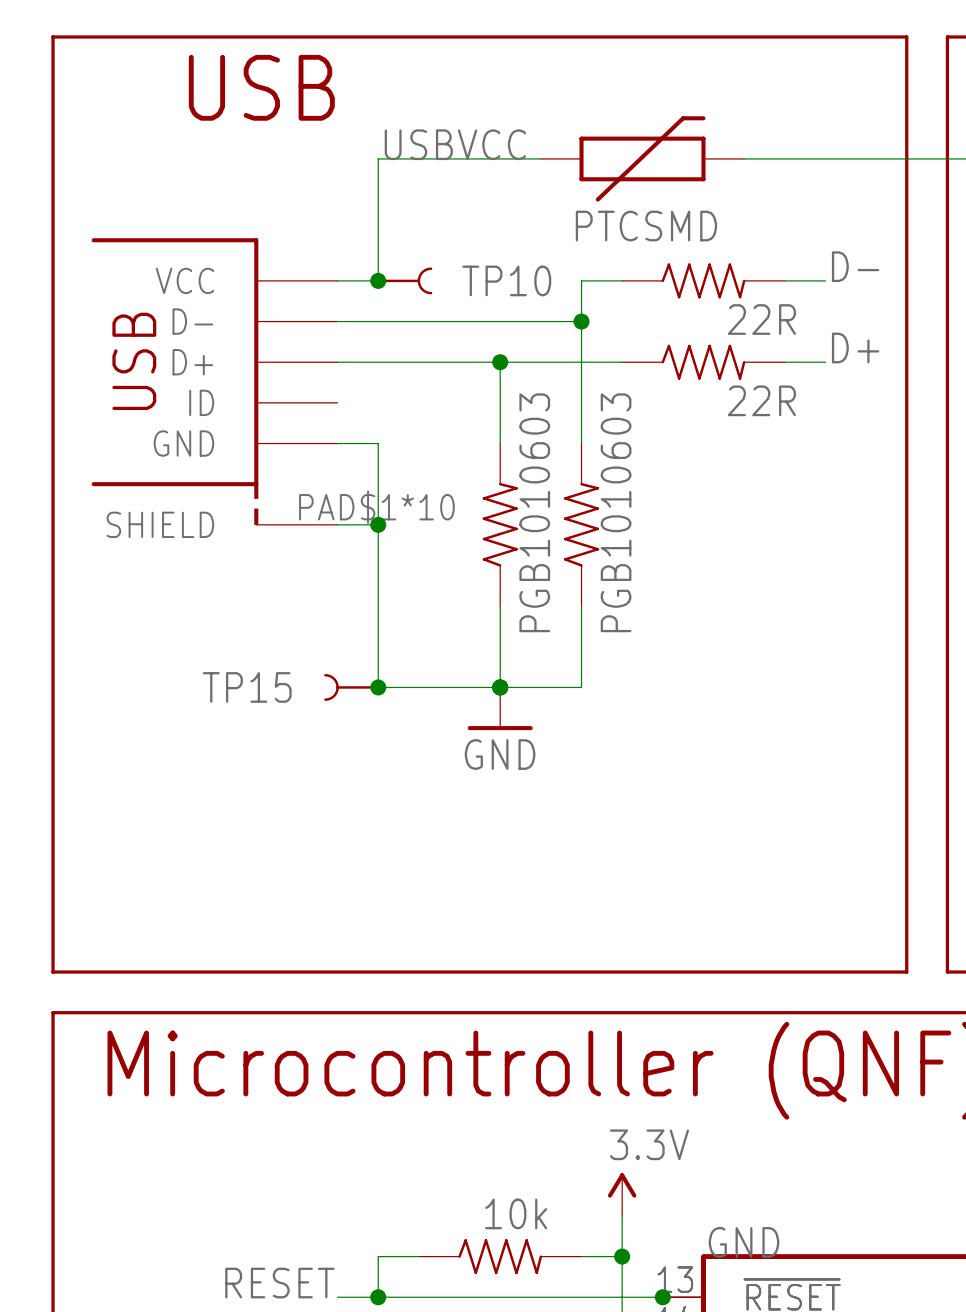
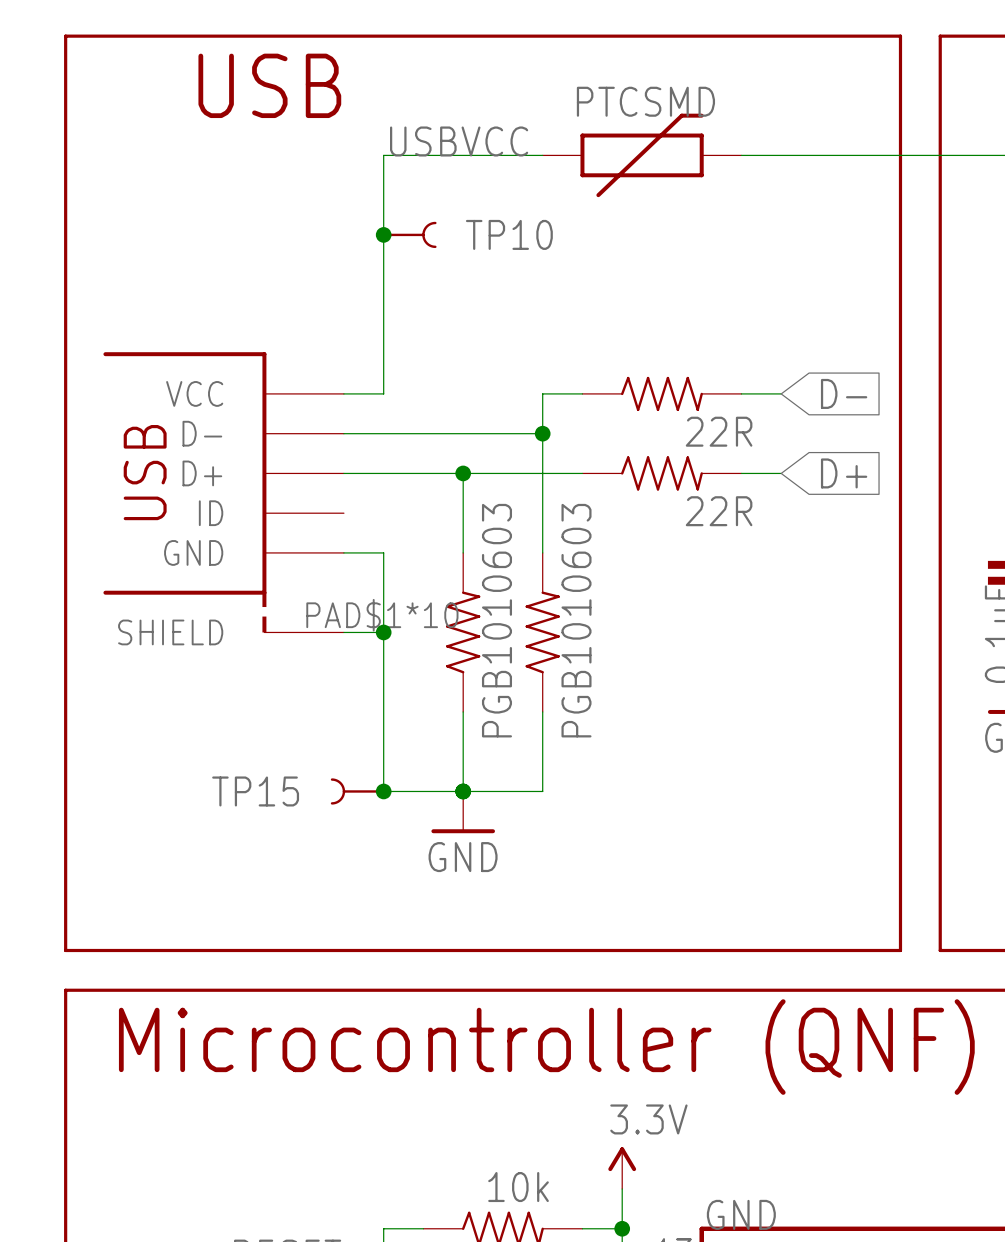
part value position: PTCSMD (646, 226) -> PTCSMD (645, 101)
label: D- (855, 266) -> none
wire: (337, 280) (378, 280) -> (343, 393) (383, 393) (383, 274)
junction position: (378, 280) -> (383, 234)
TP10 position: (404, 280) -> (409, 234)
wire: (622, 280) (581, 280) (581, 443) -> (582, 393) (542, 393) (542, 552)
part: 22R (703, 280) -> none
wire: (784, 280) (825, 280) -> (741, 393) (781, 393)
wire: (337, 321) (581, 321) -> (343, 473) (582, 473)
junction: (581, 321) -> none
label: D+ (855, 347) -> none
wire: (337, 362) (622, 362) -> none
wire: (500, 362) (500, 443) -> (463, 473) (463, 552)
junction: (500, 362) -> none
part position: (703, 362) -> (661, 393)
wire: (784, 362) (825, 362) -> (741, 473) (781, 473)
part position: (214, 382) -> (223, 493)
global label: none -> D- (844, 393)
wire: (378, 443) (378, 565) -> (343, 552) (383, 552)
wire: none -> (383, 433) (542, 433)
junction: none -> (542, 433)
junction: none -> (463, 473)
part: none -> 22R (661, 473)
global label: none -> D+ (844, 473)
wire: (337, 524) (378, 524) -> (343, 632) (383, 632)
junction: (378, 524) -> none
part: PGB1010603 (500, 524) -> none
part: PGB1010603 (581, 524) -> none
wire: (500, 606) (500, 687) -> (463, 711) (463, 791)
wire: (581, 606) (581, 687) (378, 687) -> (542, 711) (542, 791) (383, 791) (383, 672)
part: none -> PGB1010603 (463, 632)
part: none -> PGB1010603 (542, 632)
TP15 position: (351, 687) -> (357, 791)
junction position: (378, 687) -> (383, 632)
junction: (500, 687) -> none
power symbol position: GND (500, 708) -> GND (463, 812)
junction: none -> (383, 791)
junction: none -> (463, 791)

